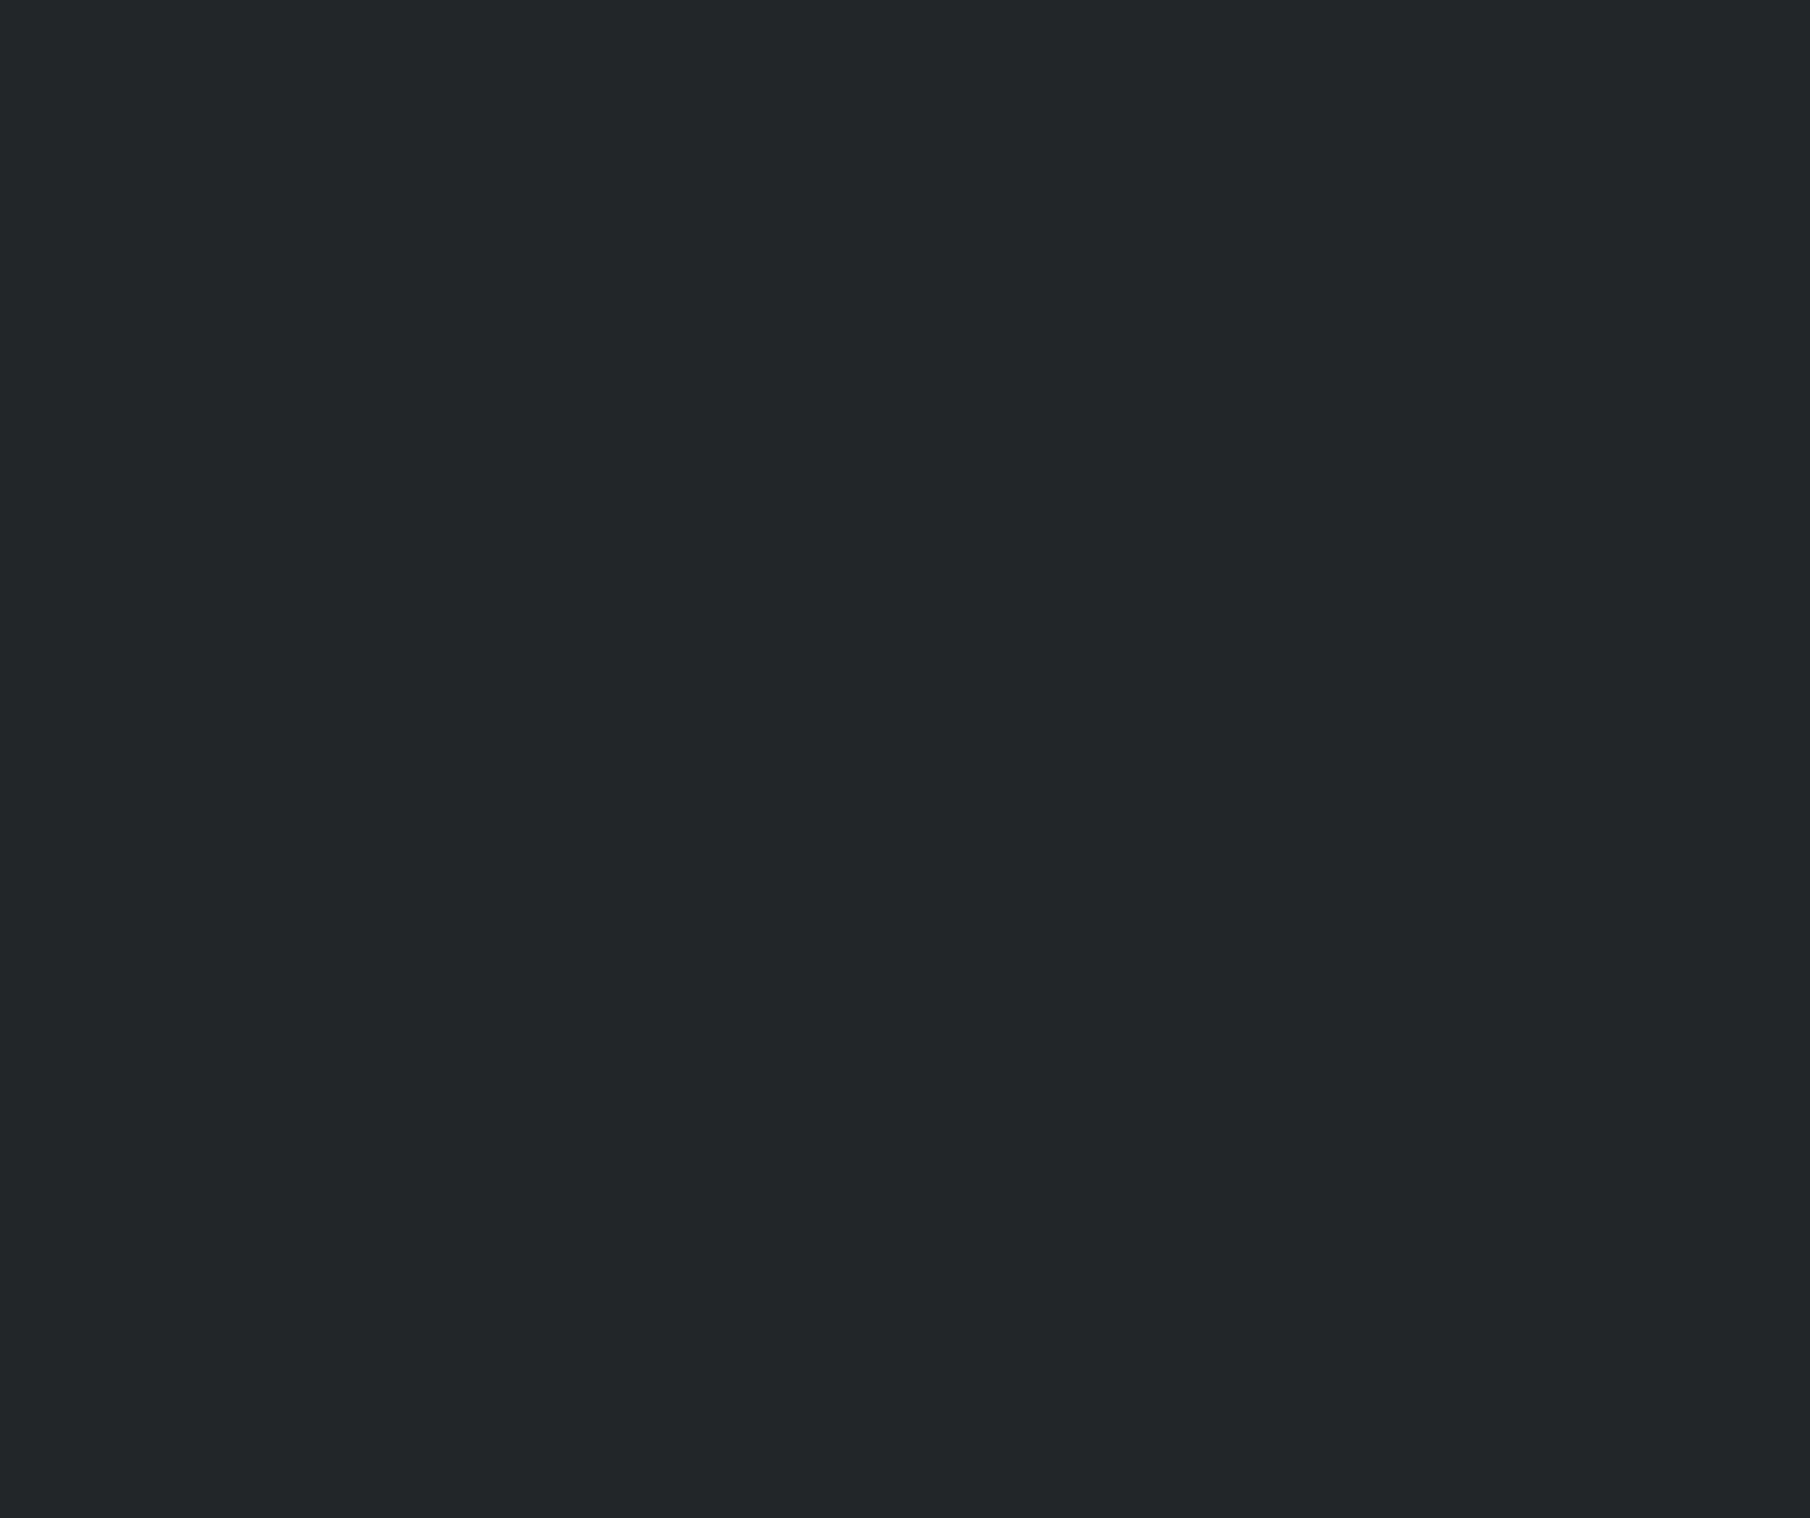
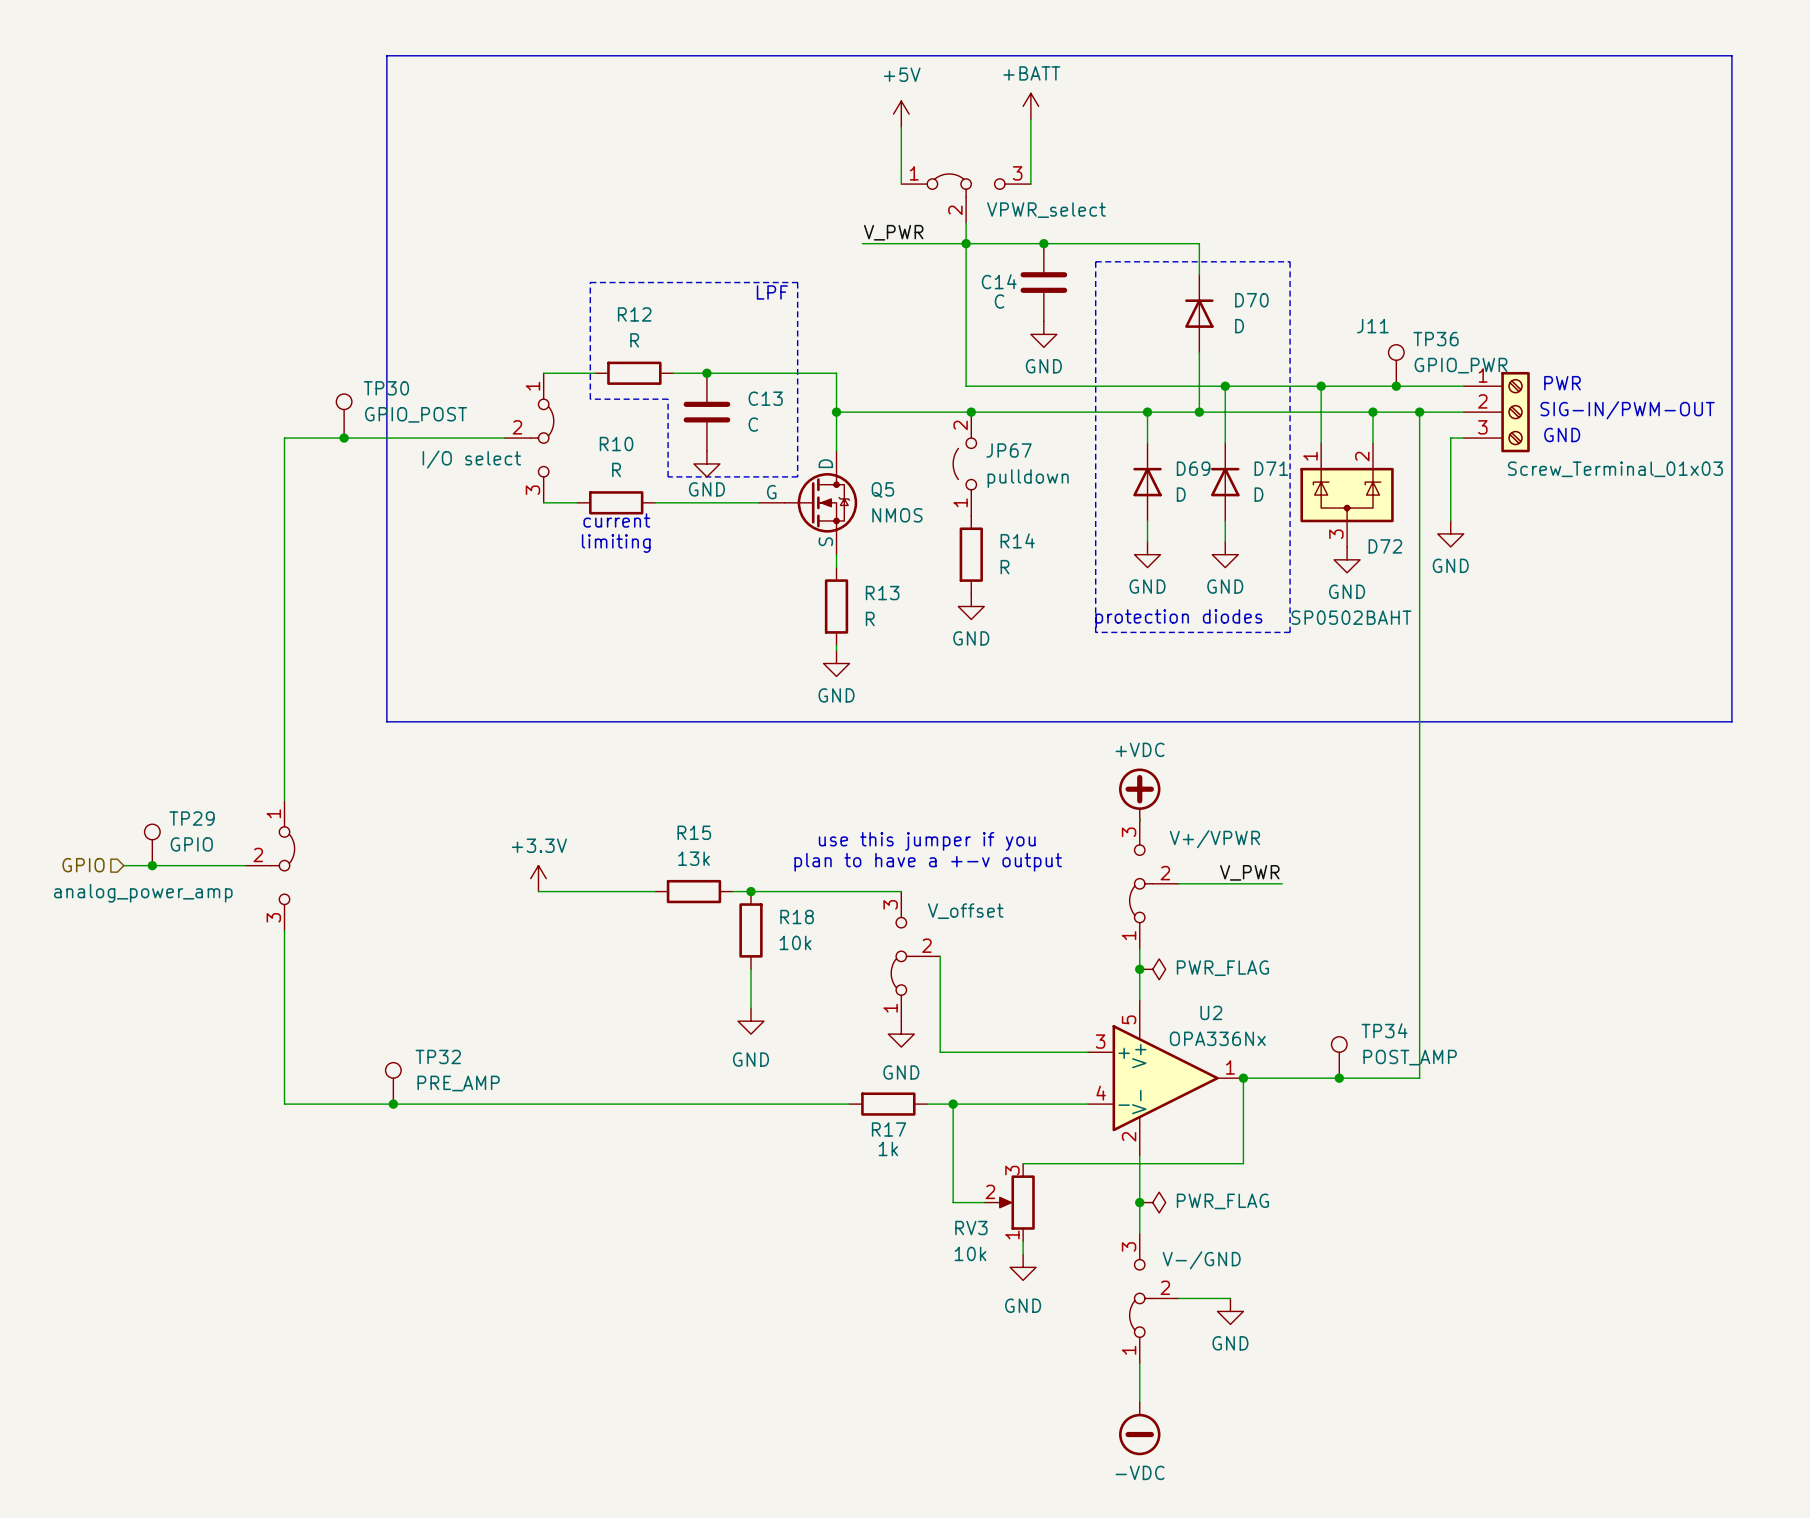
line: none -> (386, 55) (1731, 55) (1731, 721) (386, 721) (386, 55)
power symbol: none -> +BATT (1030, 106)
power symbol: none -> +5V (901, 114)
wire: none -> (1030, 119) (1030, 184)
wire: none -> (901, 127) (901, 184)
part: none -> VPWR_select (966, 198)
wire: none -> (966, 222) (966, 386) (1463, 386)
label: none -> V_PWR (893, 232)
wire: none -> (862, 243) (1199, 243) (1199, 274)
junction: none -> (966, 243)
junction: none -> (1043, 243)
line: none -> (1095, 261) (1095, 632) (1290, 632) (1290, 261) (1095, 261)
line: none -> (590, 282) (797, 282) (797, 476) (668, 476) (668, 399) (590, 399) (590, 282)
C14: none -> C (1043, 282)
text: none -> LPF (772, 292)
D70: none -> D (1199, 313)
power symbol: none -> GND (1043, 334)
wire: none -> (1199, 352) (1199, 412)
TP36: none -> GPIO_PWR (1396, 365)
wire: none -> (543, 373) (595, 373)
R12: none -> R (634, 373)
wire: none -> (673, 373) (836, 373) (836, 451)
junction: none -> (706, 373)
text: none -> PWR (1562, 383)
wire: none -> (1225, 386) (1225, 443)
junction: none -> (1225, 386)
wire: none -> (1321, 386) (1321, 443)
junction: none -> (1321, 386)
junction: none -> (1396, 386)
text: none -> SIG-IN/PWM-OUT (1627, 410)
C13: none -> C (706, 412)
wire: none -> (836, 412) (1463, 412)
junction: none -> (836, 412)
junction: none -> (971, 412)
wire: none -> (1147, 412) (1147, 443)
junction: none -> (1147, 412)
junction: none -> (1199, 412)
wire: none -> (1372, 412) (1372, 443)
junction: none -> (1372, 412)
wire: none -> (1419, 412) (1419, 1078) (1243, 1078) (1243, 1163) (1023, 1163)
junction: none -> (1419, 412)
J11: none -> Screw_Terminal_01x03 (1496, 412)
TP30: none -> GPIO_POST (344, 414)
text: none -> GND (1562, 435)
junction: none -> (344, 438)
wire: none -> (504, 438) (284, 438) (284, 800)
part: none -> I/O select (529, 438)
wire: none -> (1463, 438) (1450, 438) (1450, 520)
power symbol: none -> GND (706, 463)
JP67: none -> pulldown (964, 463)
D69: none -> D (1147, 482)
D71: none -> D (1225, 482)
D72: none -> SP0502BAHT (1347, 495)
wire: none -> (543, 502) (577, 502)
R10: none -> R (616, 502)
wire: none -> (655, 502) (758, 502)
Q5: none -> NMOS (808, 502)
text: none -> current (616, 520)
wire: none -> (1147, 520) (1147, 541)
wire: none -> (1225, 520) (1225, 541)
power symbol: none -> GND (1450, 533)
text: none -> limiting (616, 543)
wire: none -> (836, 554) (836, 567)
R14: none -> R (971, 554)
power symbol: none -> GND (1147, 554)
power symbol: none -> GND (1225, 554)
power symbol: none -> GND (1347, 559)
R13: none -> R (836, 606)
power symbol: none -> GND (971, 606)
text: none -> protection diodes (1178, 618)
wire: none -> (836, 645) (836, 650)
power symbol: none -> GND (836, 663)
power symbol: none -> +VDC (1139, 795)
wire: none -> (1139, 819) (1139, 821)
text: none -> use this jumper if you (927, 841)
TP29: none -> GPIO (152, 844)
text: none -> plan to have a +-v output (928, 862)
hierarchical label: none -> GPIO (83, 865)
wire: none -> (123, 865) (245, 865)
junction: none -> (152, 865)
part: none -> analog_power_amp (270, 865)
label: none -> V_PWR (1249, 872)
power symbol: none -> +3.3V (538, 878)
part: none -> V+/VPWR (1154, 883)
wire: none -> (1178, 883) (1282, 883)
wire: none -> (538, 891) (655, 891)
R15: none -> 13k (693, 891)
wire: none -> (732, 891) (901, 891)
junction: none -> (751, 891)
wire: none -> (284, 930) (284, 1104) (849, 1104)
R18: none -> 10k (751, 930)
wire: none -> (1139, 948) (1139, 1000)
part: none -> V_offset (915, 956)
wire: none -> (940, 956) (940, 1052) (1087, 1052)
wire: none -> (751, 969) (751, 1008)
junction: none -> (1139, 969)
power symbol: none -> PWR_FLAG (1152, 969)
power symbol: none -> GND (751, 1021)
power symbol: none -> GND (901, 1034)
TP34: none -> POST_AMP (1339, 1057)
U2: none -> OPA336Nx (1165, 1078)
junction: none -> (1243, 1078)
junction: none -> (1339, 1078)
TP32: none -> PRE_AMP (393, 1083)
junction: none -> (393, 1104)
R17: none -> 1k (888, 1104)
wire: none -> (927, 1104) (1087, 1104)
wire: none -> (953, 1104) (953, 1202) (984, 1202)
junction: none -> (953, 1104)
wire: none -> (1139, 1155) (1139, 1233)
RV3: none -> 10k (1009, 1202)
junction: none -> (1139, 1202)
power symbol: none -> PWR_FLAG (1152, 1202)
wire: none -> (1023, 1241) (1023, 1254)
power symbol: none -> GND (1023, 1267)
part: none -> V-/GND (1154, 1298)
wire: none -> (1178, 1298) (1230, 1298)
power symbol: none -> GND (1230, 1311)
wire: none -> (1139, 1363) (1139, 1402)
power symbol: none -> -VDC (1139, 1428)

